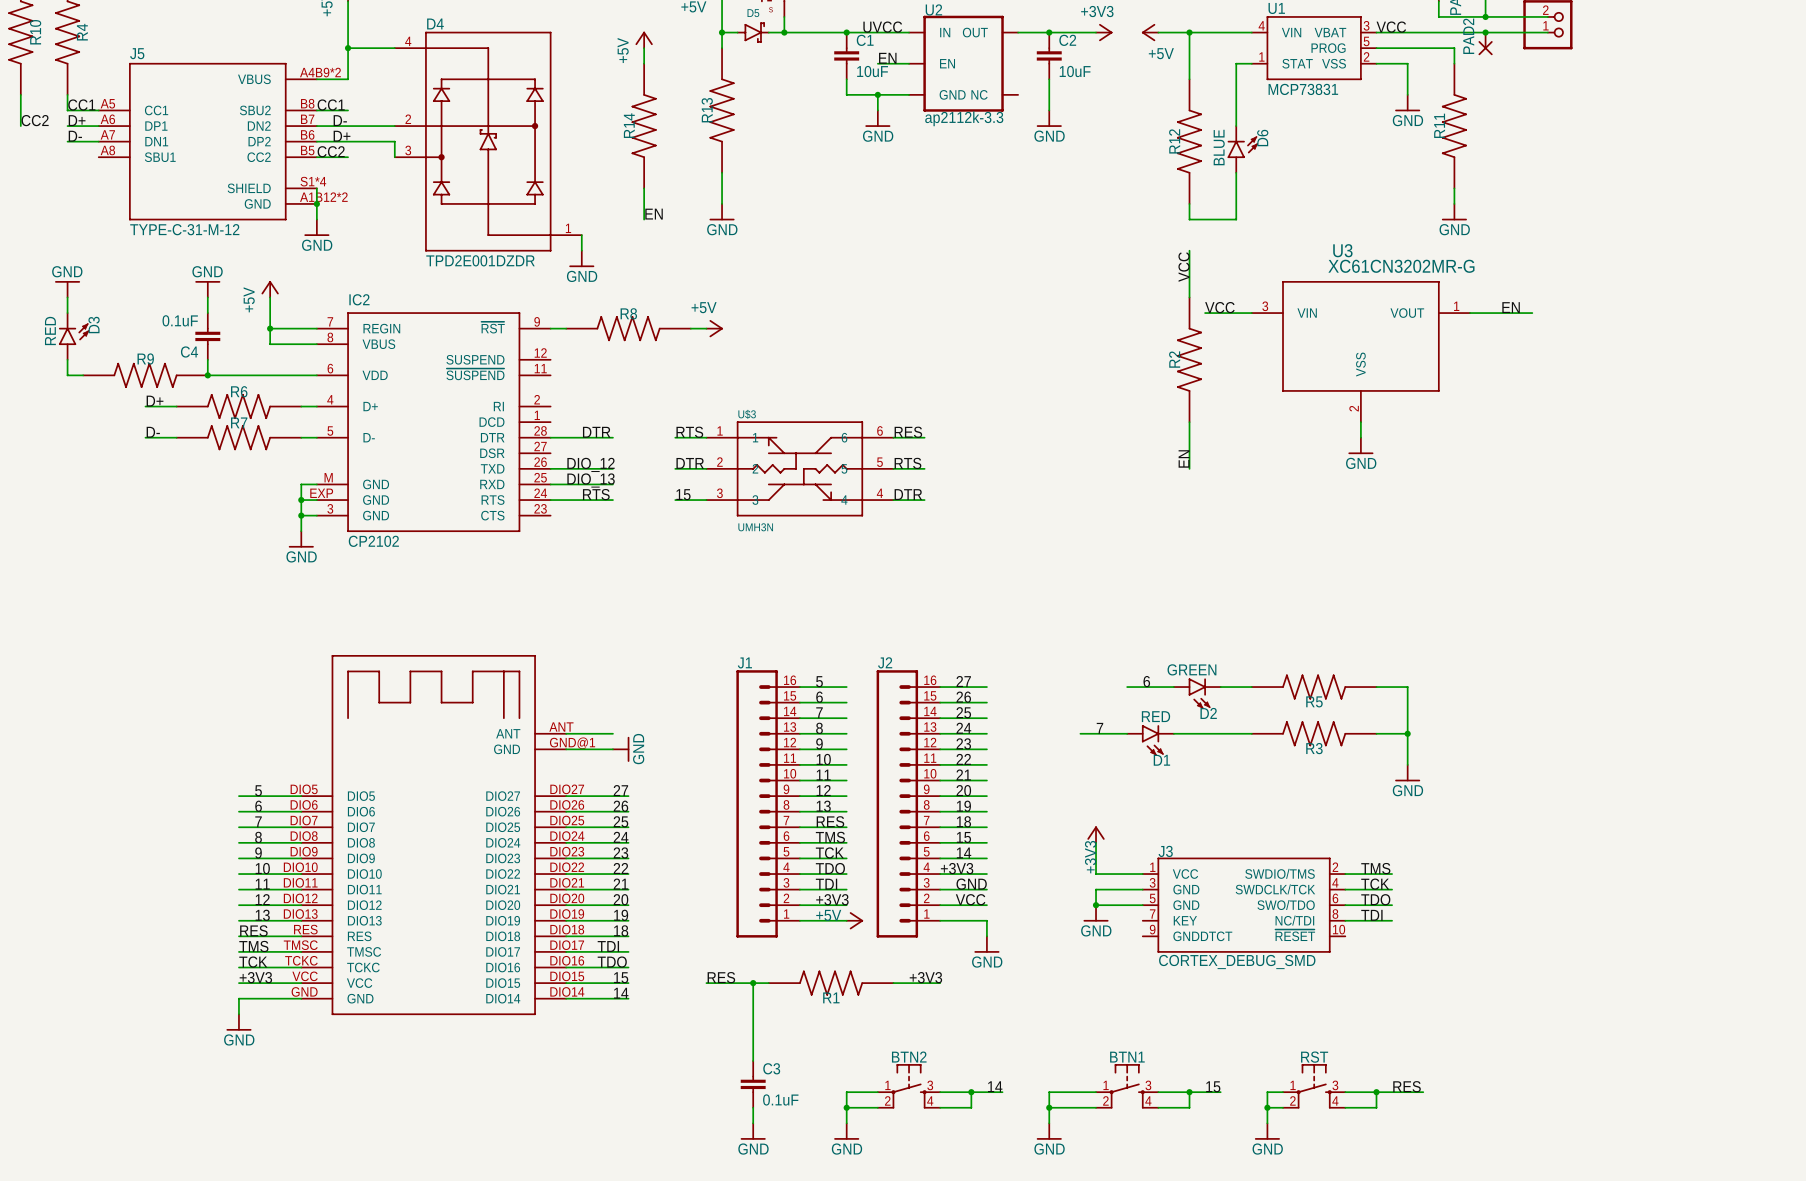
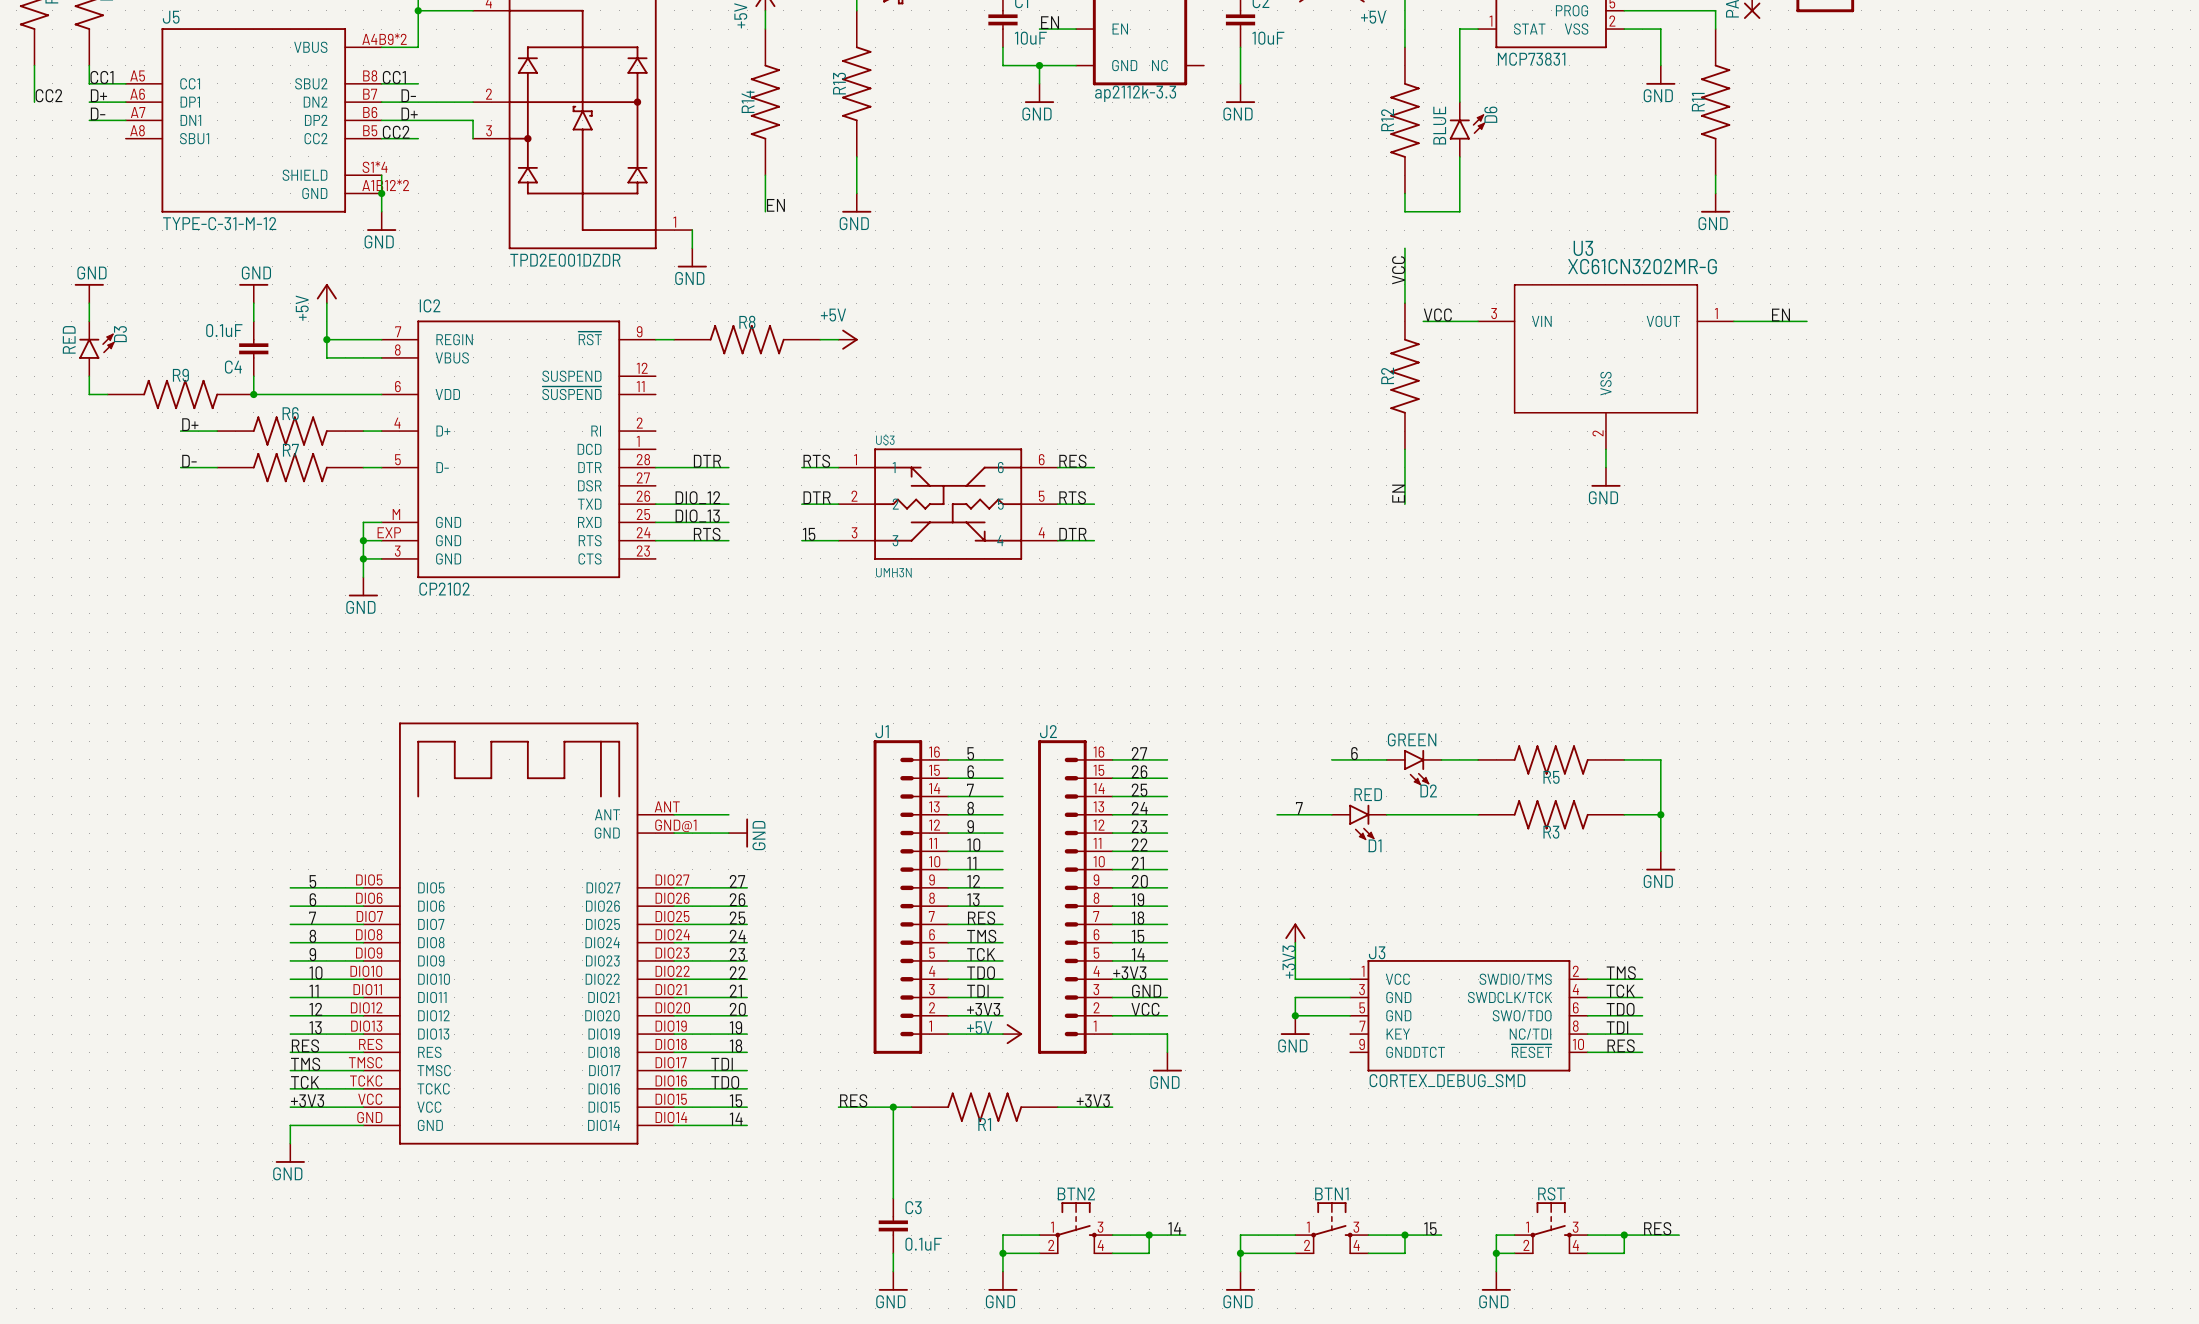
label: none -> RES (1621, 1045)
wire: none -> (1587, 1052) (1642, 1052)

